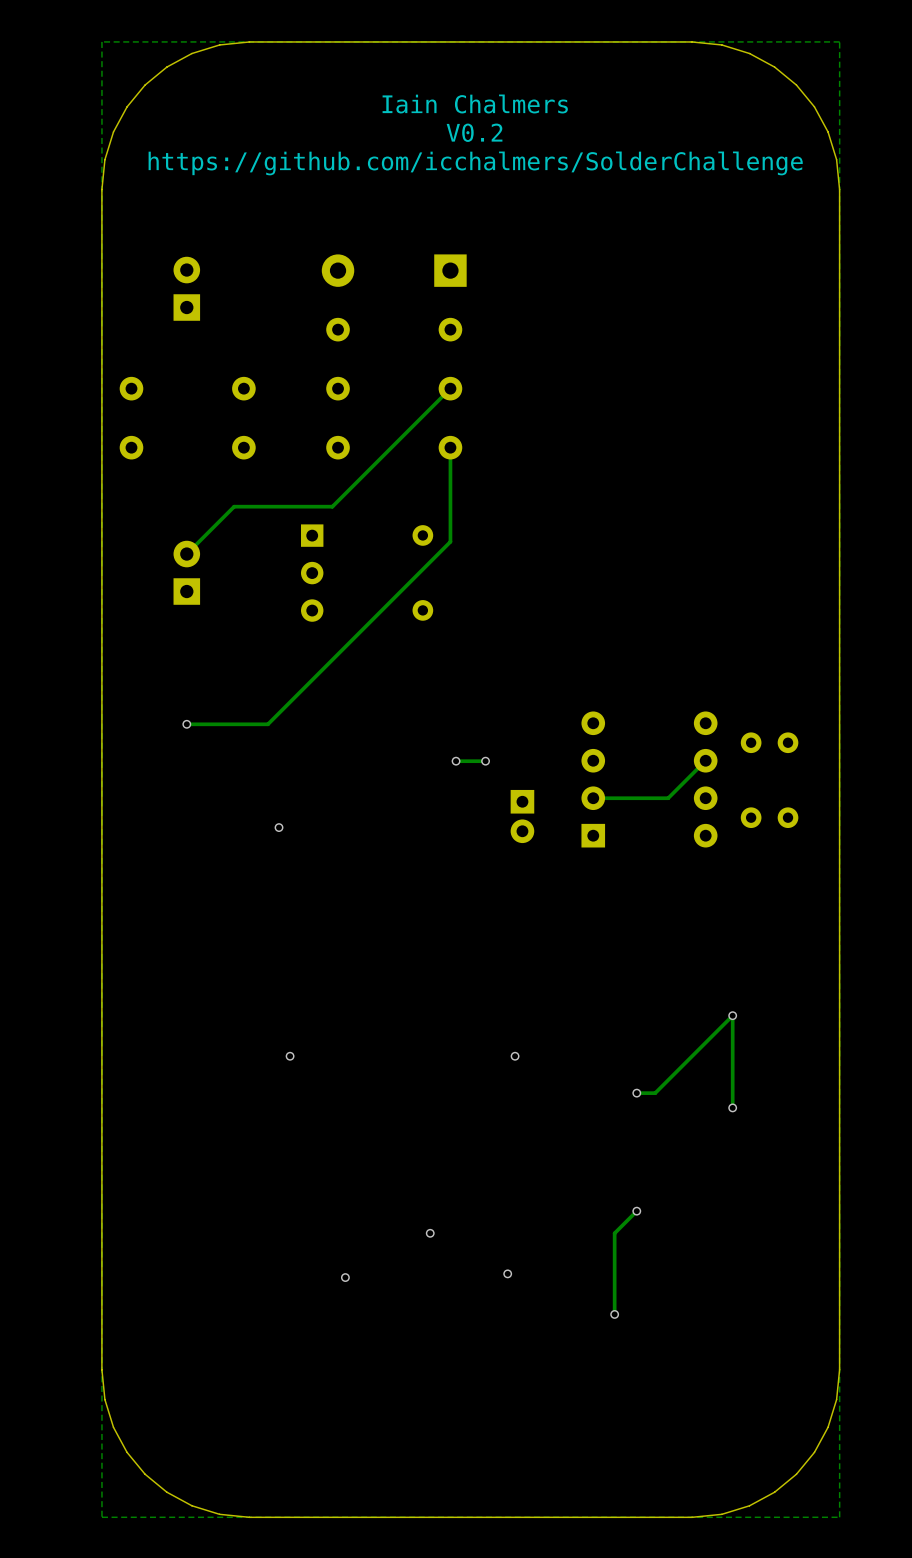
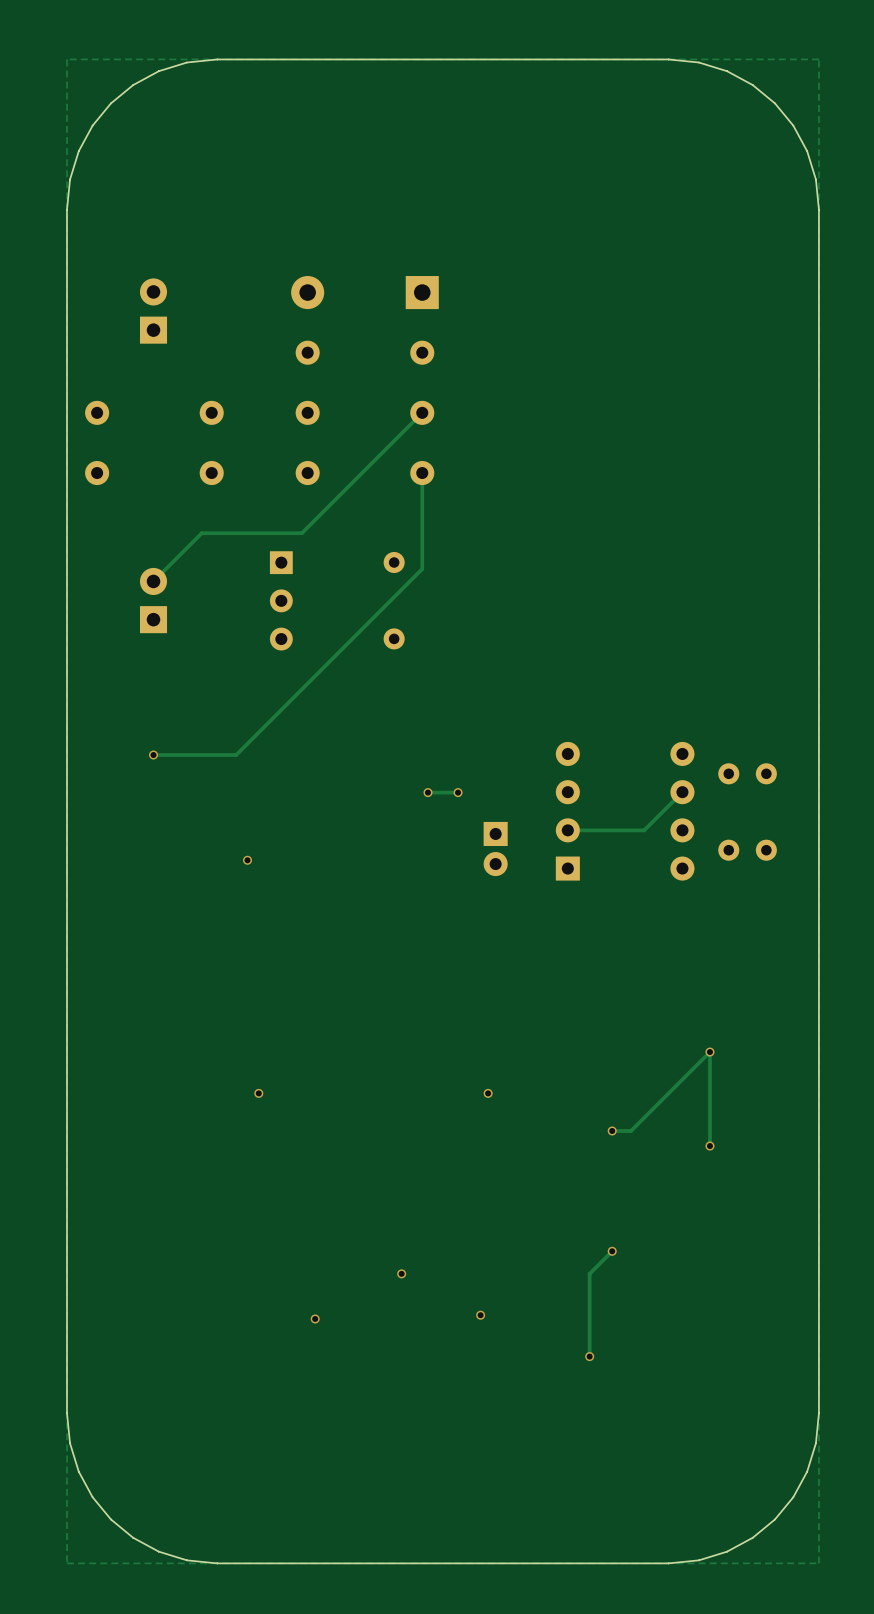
text: Iain Chalmers (475, 103) -> none
text: V0.2 (474, 132) -> none
text: https://github.com/icchalmers/SolderChallenge (475, 163) -> none

